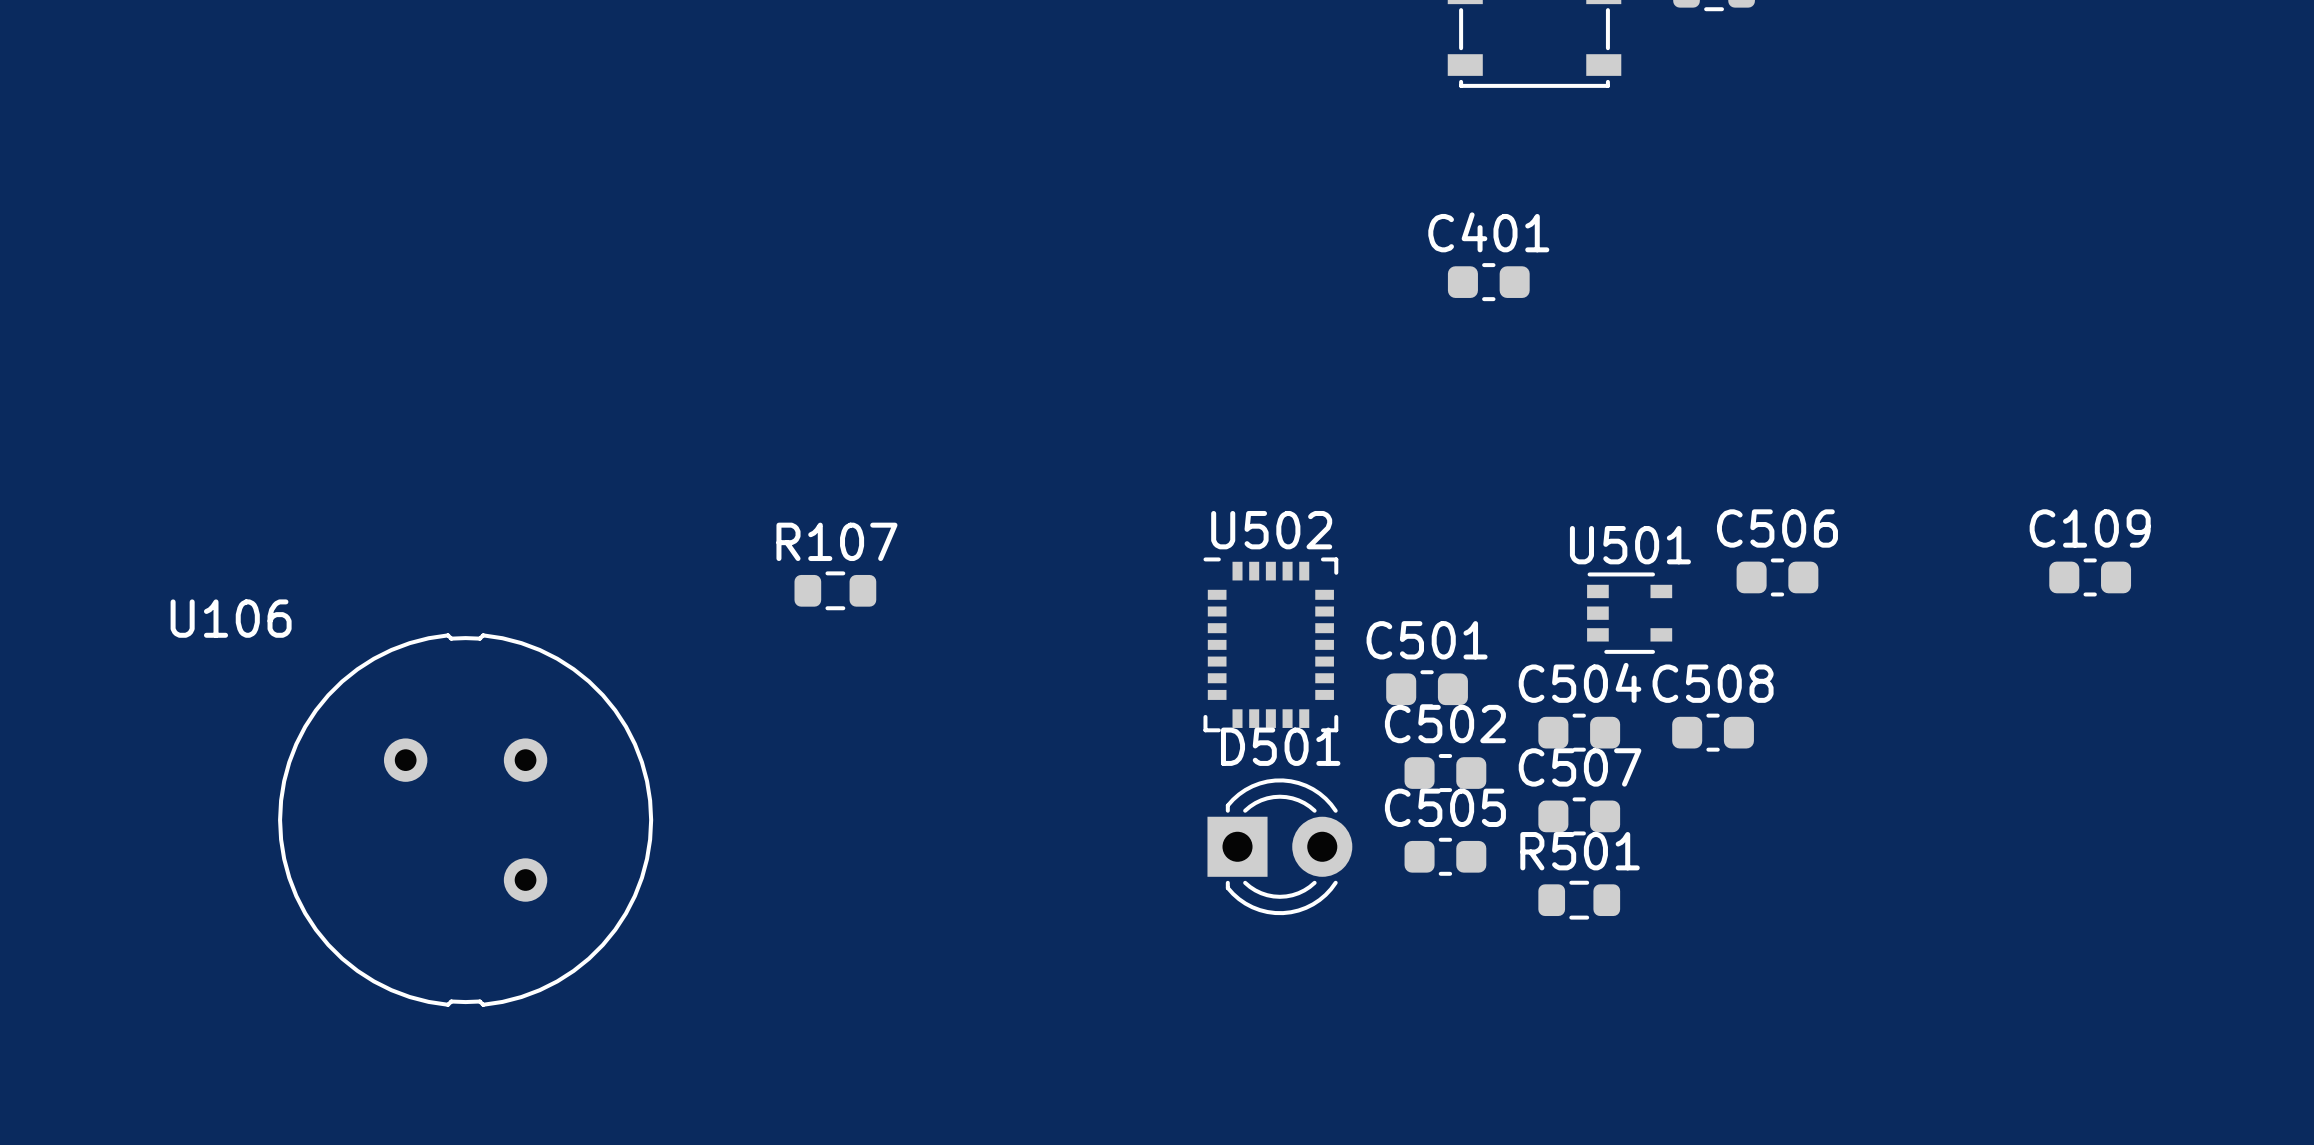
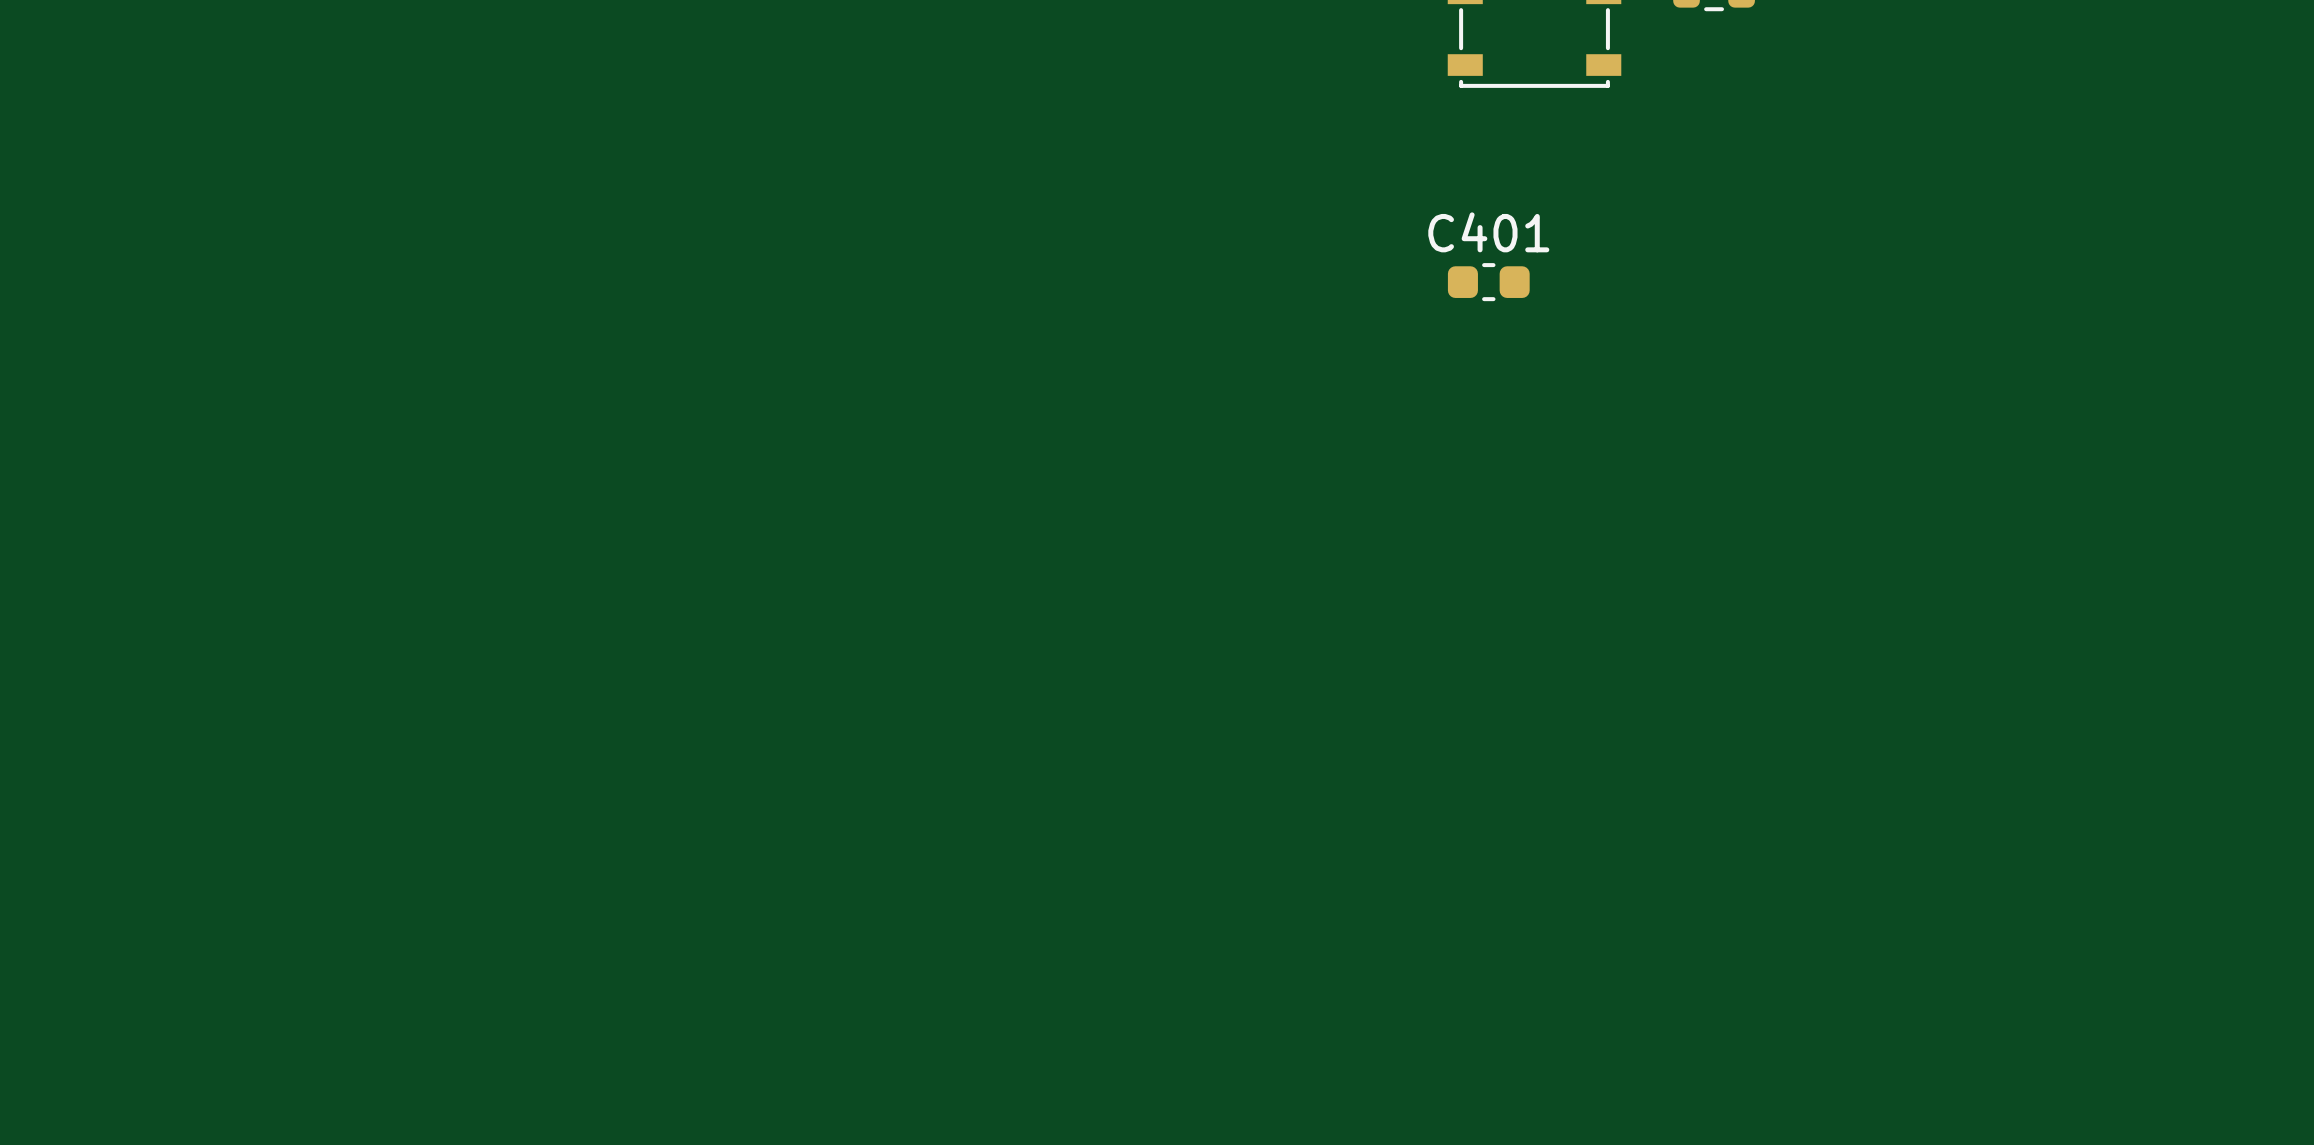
C506: (1777, 577) -> none
C109: (2090, 577) -> none
R107: (835, 590) -> none
U501: (1629, 613) -> none
U502: (1270, 644) -> none
C501: (1427, 689) -> none
C504: (1579, 732) -> none
C508: (1713, 732) -> none
C502: (1445, 773) -> none
C507: (1579, 816) -> none
U106: (465, 820) -> none
D501: (1279, 846) -> none
C505: (1445, 856) -> none
R501: (1579, 900) -> none

